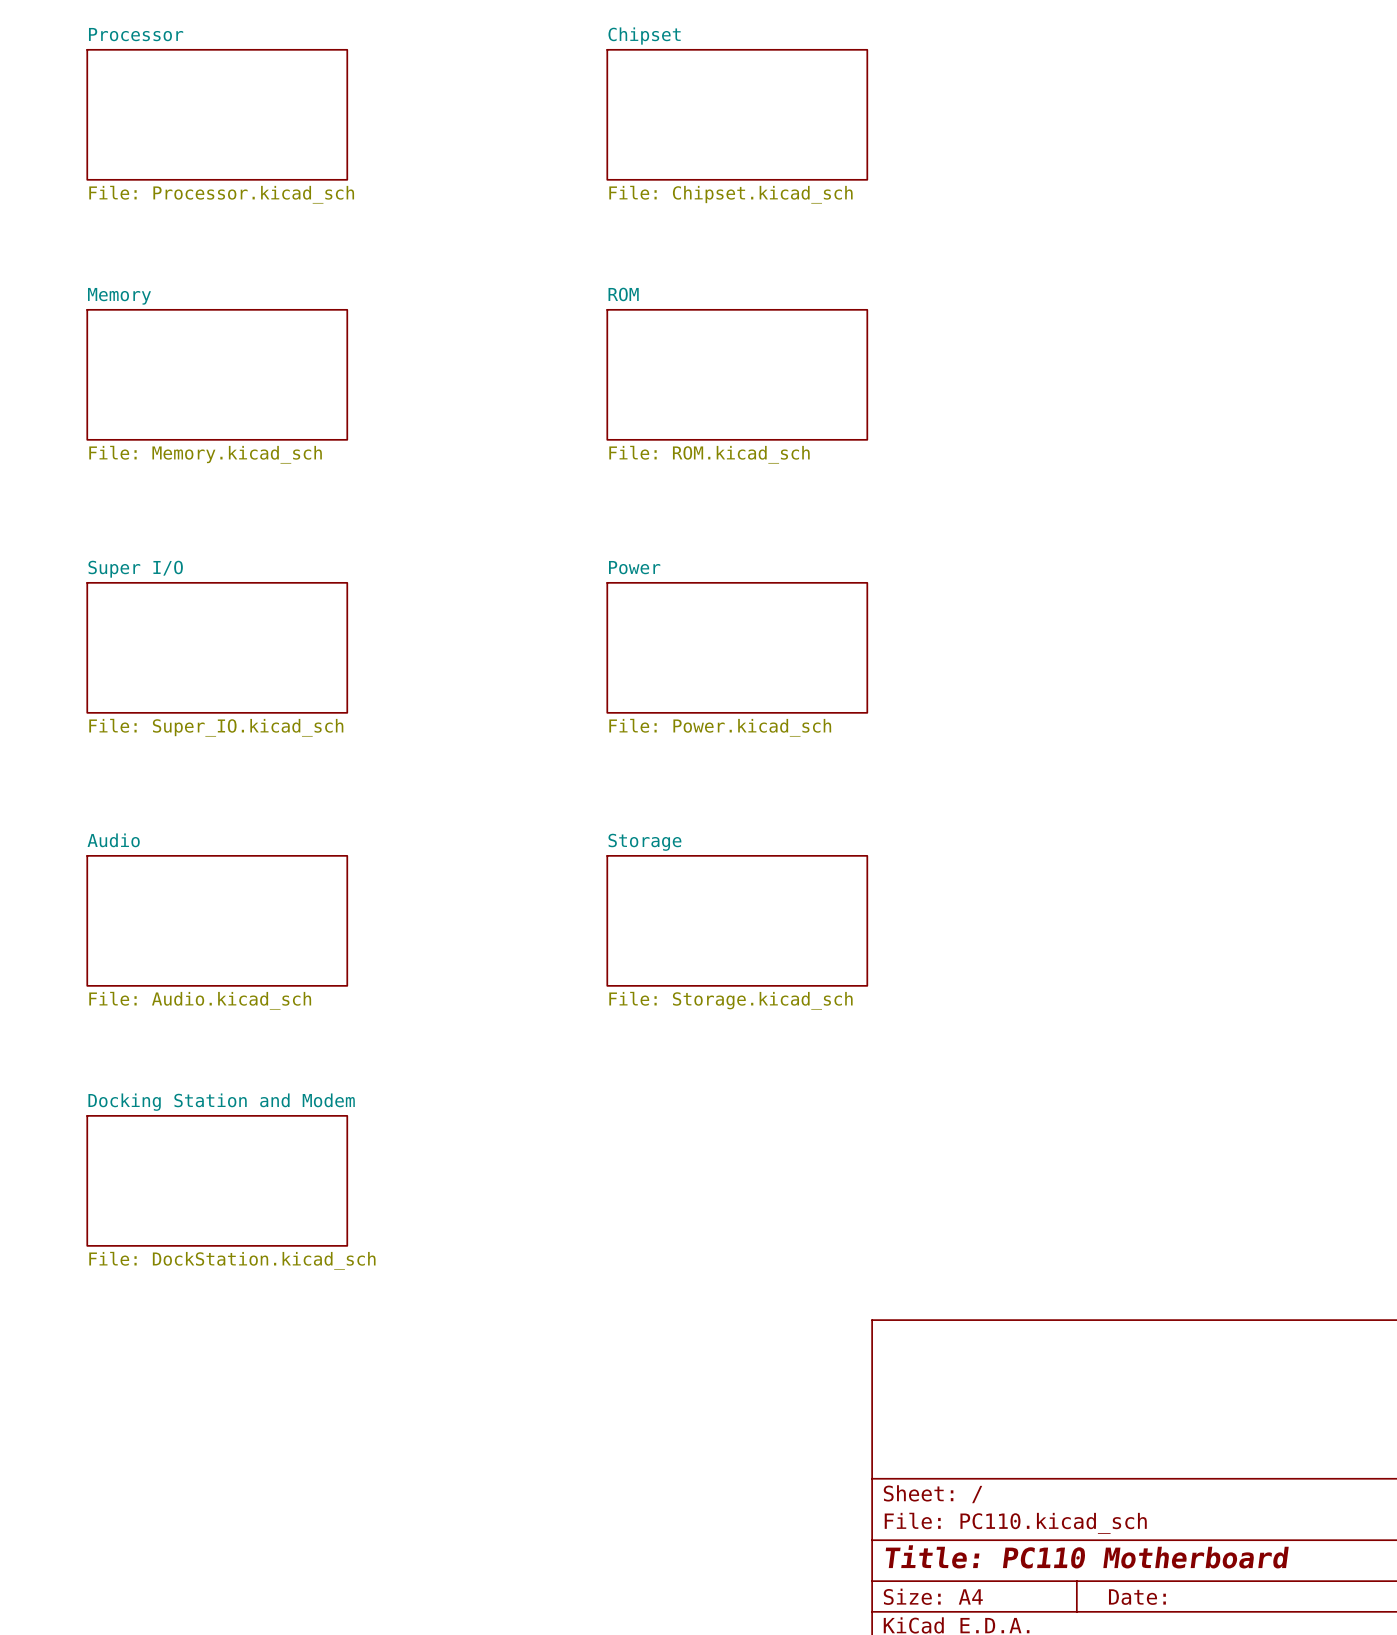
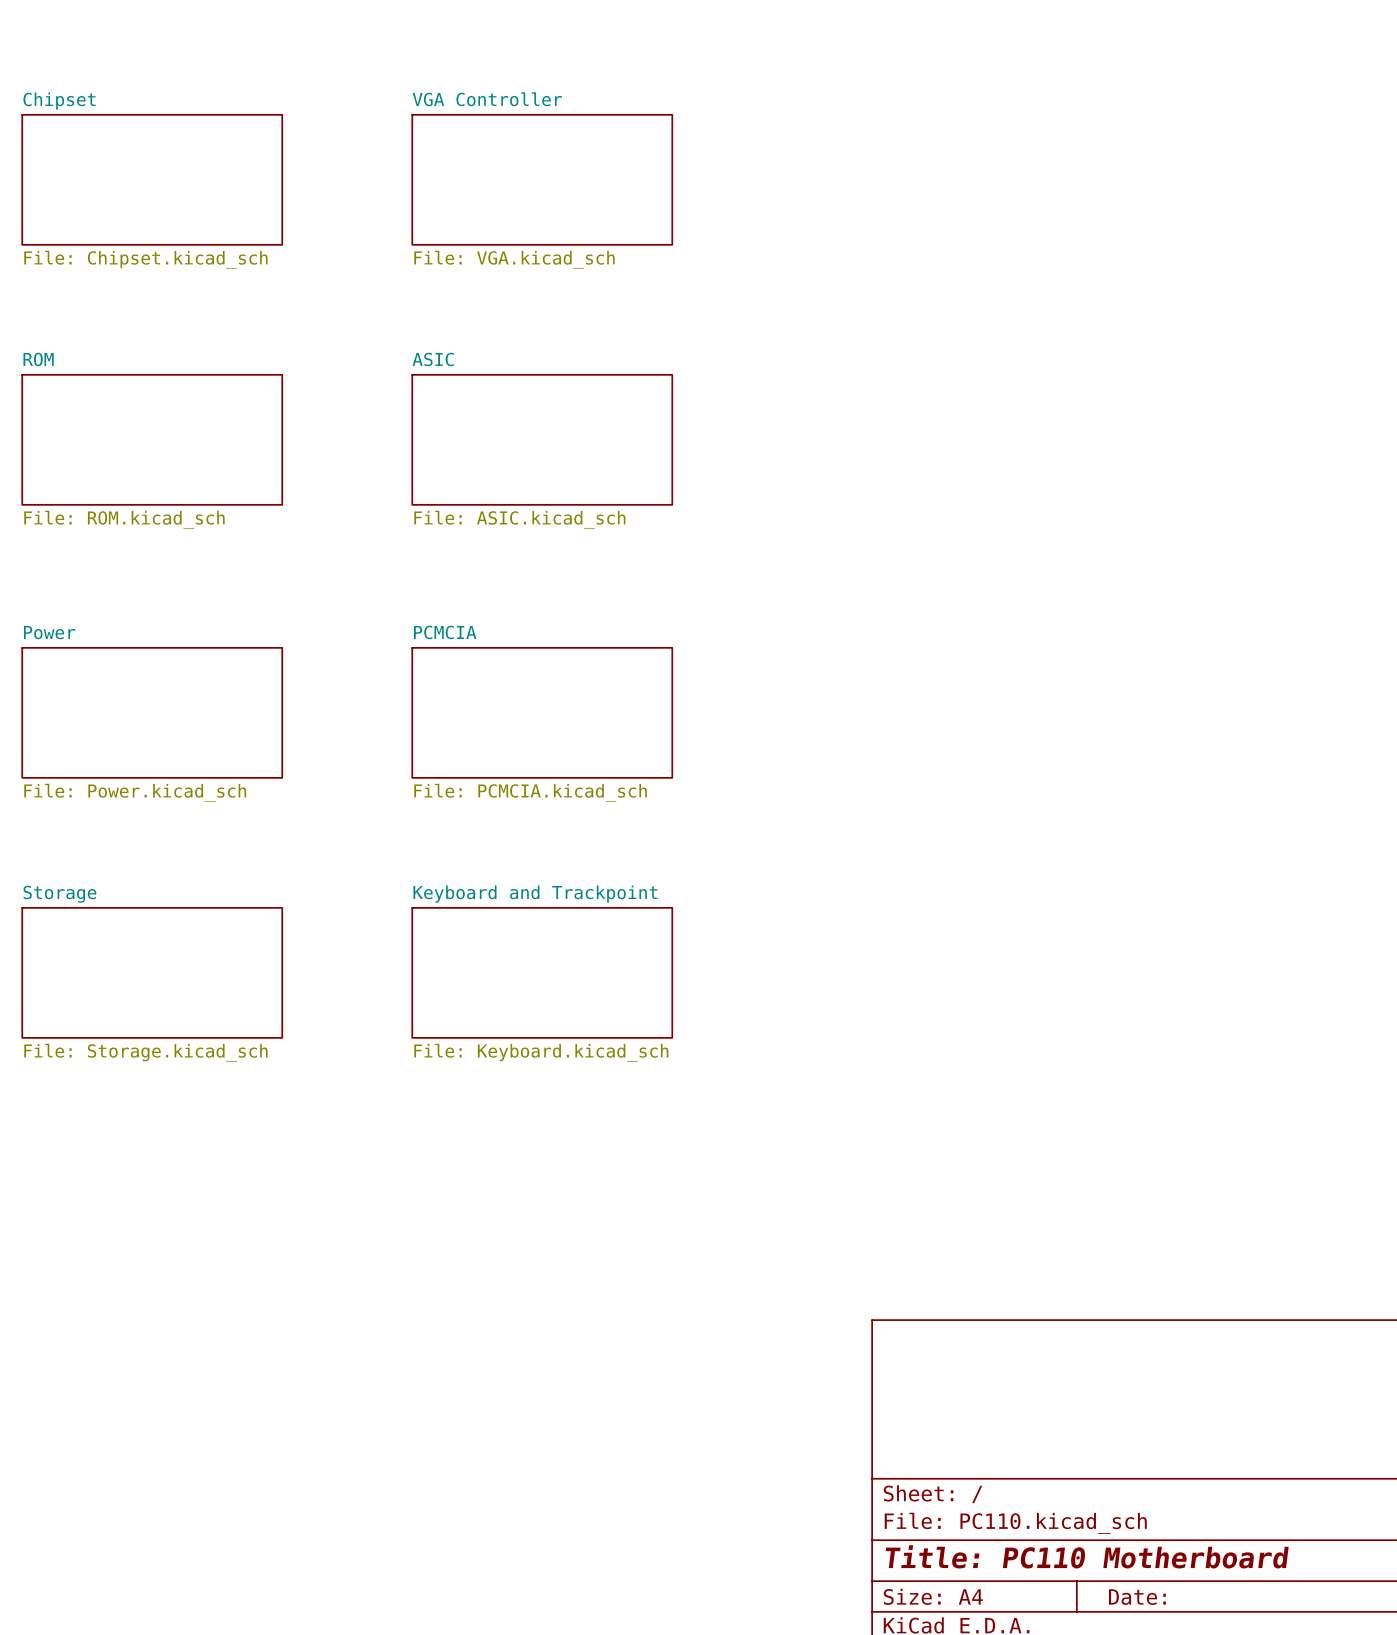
sheet Processor: File: Processor.kicad_sch (217, 114) -> none
sheet Chipset: File: Chipset.kicad_sch (737, 114) -> none
sheet Chipset: none -> File: Chipset.kicad_sch (152, 179)
sheet VGA Controller: none -> File: VGA.kicad_sch (542, 179)
sheet Memory: File: Memory.kicad_sch (217, 374) -> none
sheet ROM: File: ROM.kicad_sch (737, 374) -> none
sheet ROM: none -> File: ROM.kicad_sch (152, 439)
sheet ASIC: none -> File: ASIC.kicad_sch (542, 439)
sheet Super I/O: File: Super_IO.kicad_sch (217, 647) -> none
sheet Power: File: Power.kicad_sch (737, 647) -> none
sheet Power: none -> File: Power.kicad_sch (152, 712)
sheet PCMCIA: none -> File: PCMCIA.kicad_sch (542, 712)
sheet Audio: File: Audio.kicad_sch (217, 920) -> none
sheet Storage: File: Storage.kicad_sch (737, 920) -> none
sheet Storage: none -> File: Storage.kicad_sch (152, 972)
sheet Keyboard and Trackpoint: none -> File: Keyboard.kicad_sch (542, 972)
sheet Docking Station and Modem: File: DockStation.kicad_sch (217, 1180) -> none

